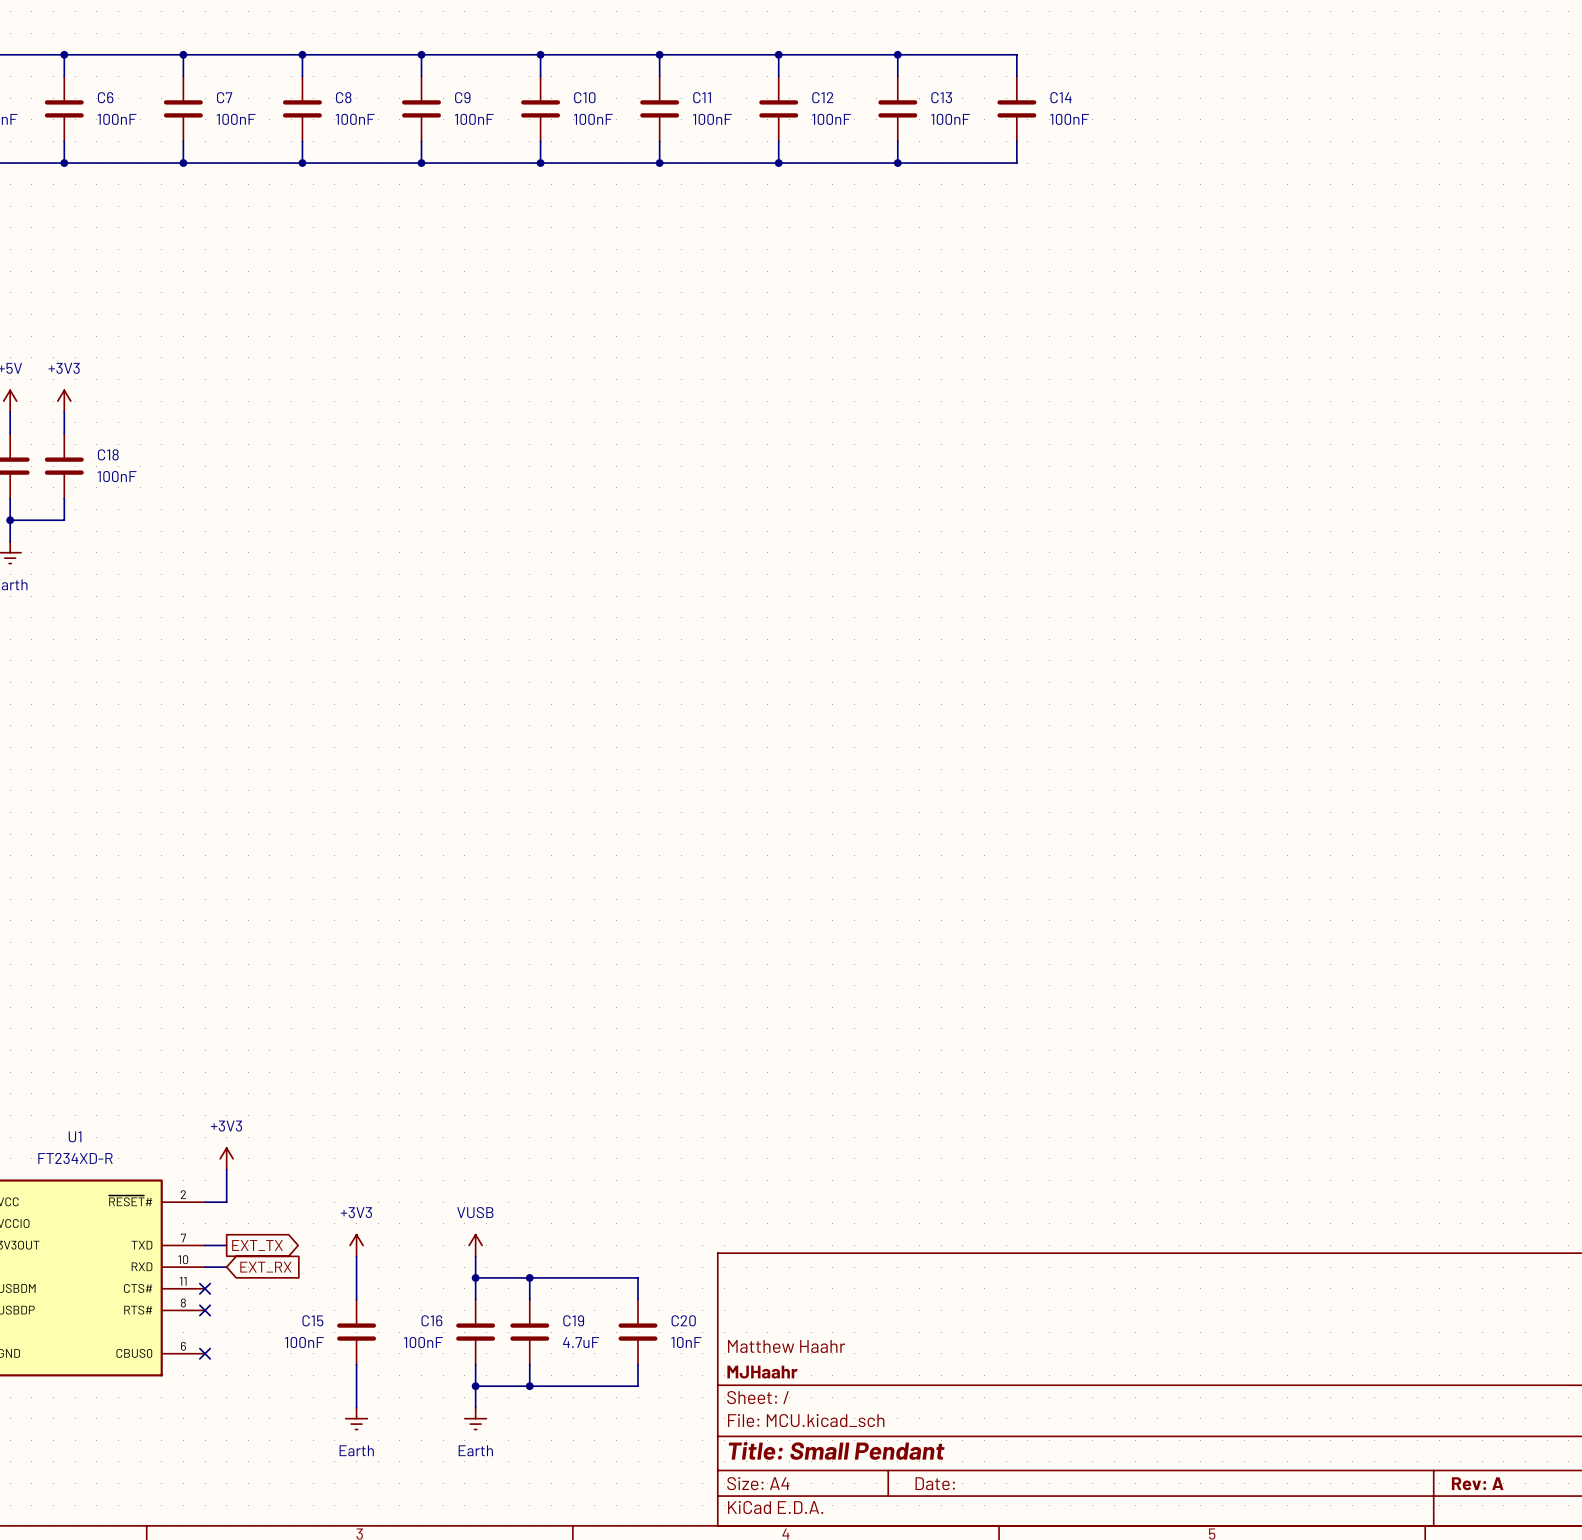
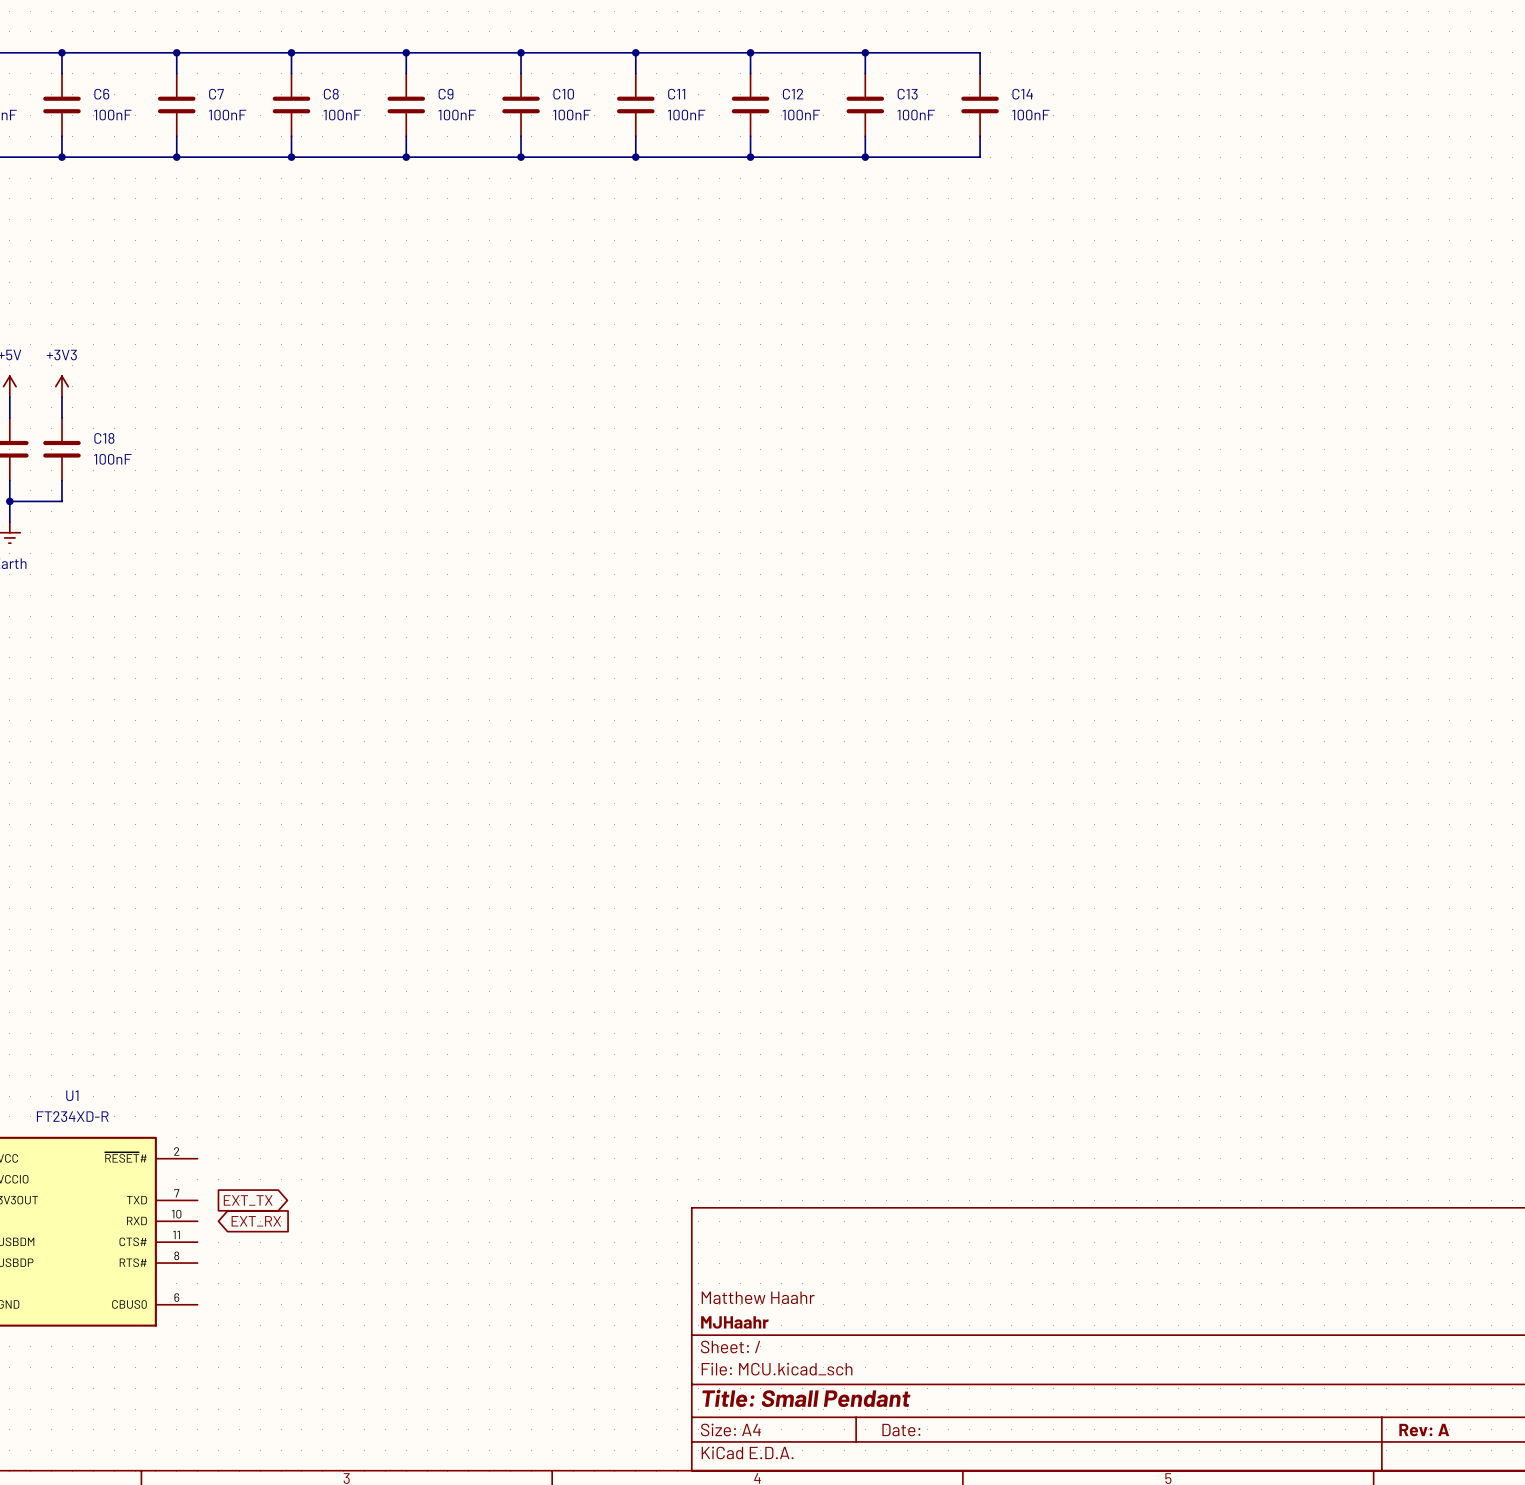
power symbol: +3V3 (226, 1158) -> none
wire: (226, 1169) (226, 1202) (205, 1202) -> none
wire: (205, 1245) (226, 1245) -> none
power symbol: +3V3 (356, 1245) -> none
power symbol: VUSB (475, 1245) -> none
wire: (356, 1256) (356, 1299) -> none
wire: (475, 1256) (475, 1299) -> none
wire: (205, 1267) (226, 1267) -> none
wire: (475, 1277) (638, 1277) (638, 1299) -> none
junction: (475, 1277) -> none
wire: (529, 1277) (529, 1299) -> none
junction: (529, 1277) -> none
no-connect mark: (205, 1288) -> none
no-connect mark: (205, 1310) -> none
C15: 100nF (356, 1332) -> none
C16: 100nF (475, 1332) -> none
C19: 4.7uF (529, 1332) -> none
C20: 10nF (638, 1332) -> none
no-connect mark: (205, 1353) -> none
wire: (356, 1364) (356, 1407) -> none
wire: (475, 1364) (475, 1407) -> none
wire: (529, 1364) (529, 1386) -> none
wire: (638, 1364) (638, 1386) (475, 1386) -> none
junction: (475, 1386) -> none
junction: (529, 1386) -> none
power symbol: Earth (356, 1418) -> none
power symbol: Earth (475, 1418) -> none

